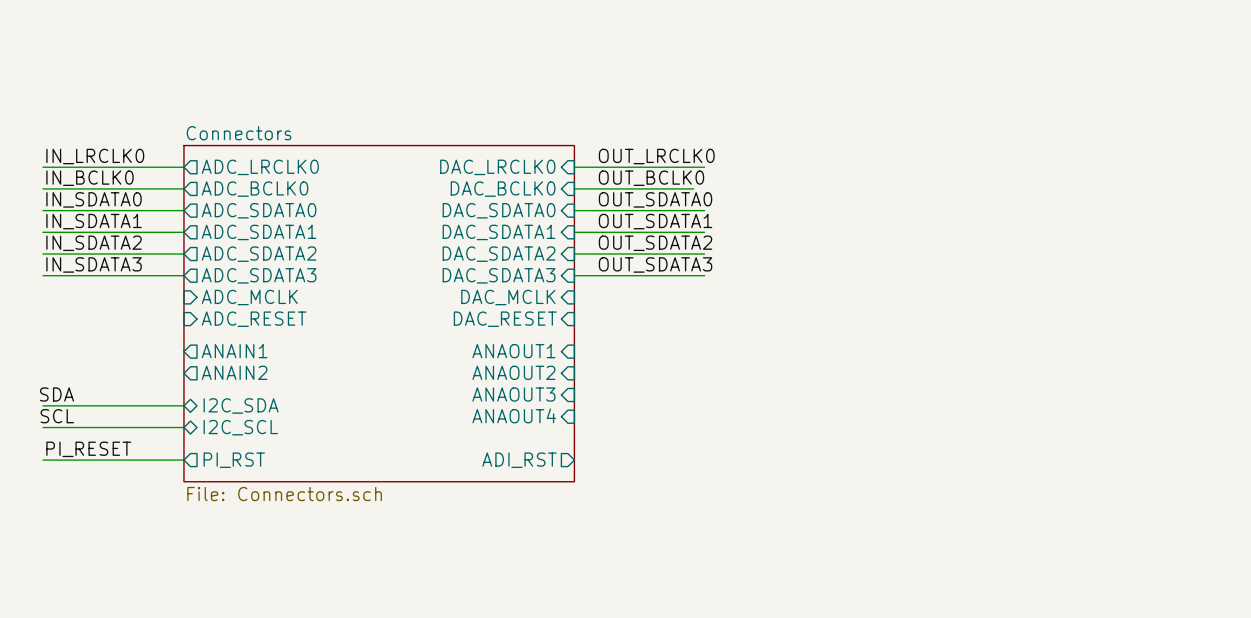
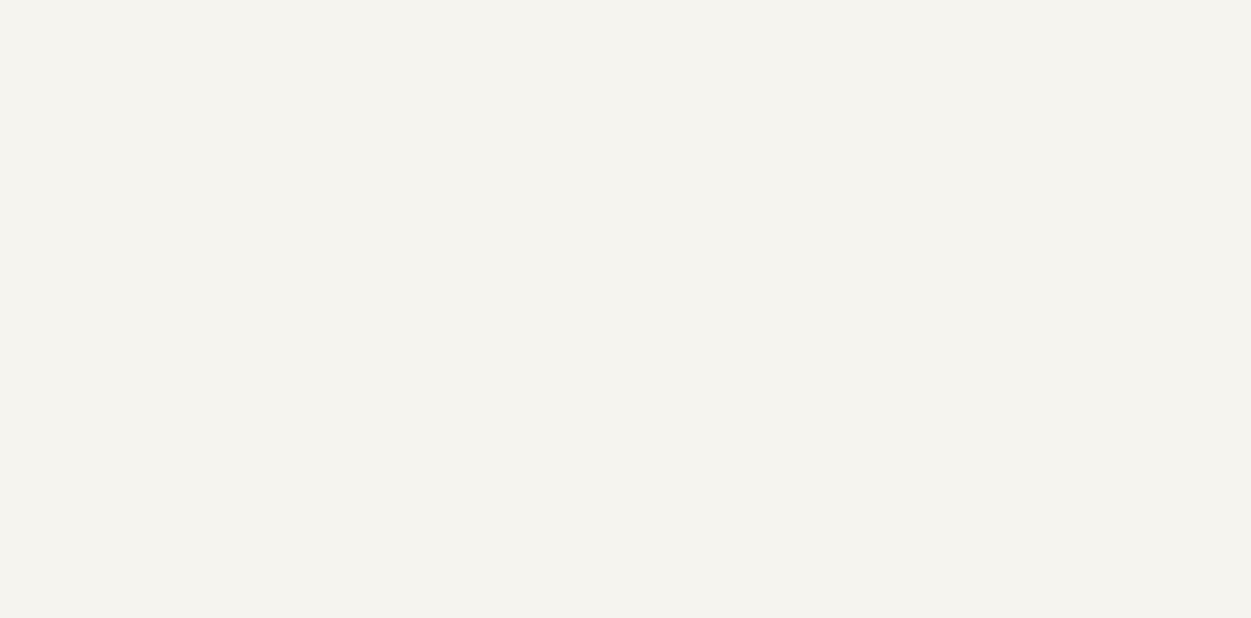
label: IN_LRCLK0 (95, 156) -> none
label: OUT_LRCLK0 (656, 156) -> none
wire: (42, 167) (183, 167) -> none
sheet pin: ADC_LRCLK0 (260, 167) -> none
sheet pin: DAC_LRCLK0 (497, 167) -> none
wire: (574, 167) (704, 167) -> none
label: IN_BCLK0 (90, 178) -> none
label: OUT_BCLK0 (651, 178) -> none
wire: (42, 188) (183, 188) -> none
wire: (574, 188) (693, 188) -> none
sheet pin: ADC_BCLK0 (255, 189) -> none
sheet pin: DAC_BCLK0 (503, 189) -> none
label: IN_SDATA0 (94, 199) -> none
label: OUT_SDATA0 (655, 199) -> none
wire: (42, 210) (183, 210) -> none
sheet pin: ADC_SDATA0 (259, 210) -> none
sheet pin: DAC_SDATA0 (499, 210) -> none
wire: (574, 210) (704, 210) -> none
label: IN_SDATA1 (94, 221) -> none
label: OUT_SDATA1 (655, 221) -> none
wire: (42, 232) (183, 232) -> none
sheet pin: ADC_SDATA1 (259, 232) -> none
sheet pin: DAC_SDATA1 (499, 232) -> none
wire: (574, 232) (704, 232) -> none
label: IN_SDATA2 (94, 243) -> none
label: OUT_SDATA2 (655, 243) -> none
wire: (42, 254) (183, 254) -> none
sheet pin: ADC_SDATA2 (259, 254) -> none
sheet pin: DAC_SDATA2 (499, 254) -> none
wire: (574, 254) (704, 254) -> none
label: IN_SDATA3 (94, 264) -> none
label: OUT_SDATA3 (655, 264) -> none
wire: (42, 275) (183, 275) -> none
sheet pin: ADC_SDATA3 (259, 275) -> none
sheet pin: DAC_SDATA3 (499, 275) -> none
wire: (574, 275) (704, 275) -> none
sheet pin: ADC_MCLK (249, 297) -> none
sheet pin: DAC_MCLK (508, 297) -> none
sheet Connectors: File: Connectors.sch (379, 313) -> none
sheet pin: ADC_RESET (254, 319) -> none
sheet pin: DAC_RESET (505, 319) -> none
sheet pin: ANAIN1 (234, 351) -> none
sheet pin: ANAOUT1 (513, 351) -> none
sheet pin: ANAIN2 (234, 372) -> none
sheet pin: ANAOUT2 (513, 372) -> none
label: SDA (57, 394) -> none
sheet pin: ANAOUT3 (513, 394) -> none
wire: (42, 405) (183, 405) -> none
sheet pin: I2C_SDA (241, 405) -> none
sheet pin: ANAOUT4 (514, 415) -> none
label: SCL (57, 416) -> none
wire: (42, 427) (183, 427) -> none
sheet pin: I2C_SCL (240, 427) -> none
label: PI_RESET (88, 449) -> none
wire: (42, 460) (183, 460) -> none
sheet pin: PI_RST (234, 460) -> none
sheet pin: ADI_RST (519, 460) -> none

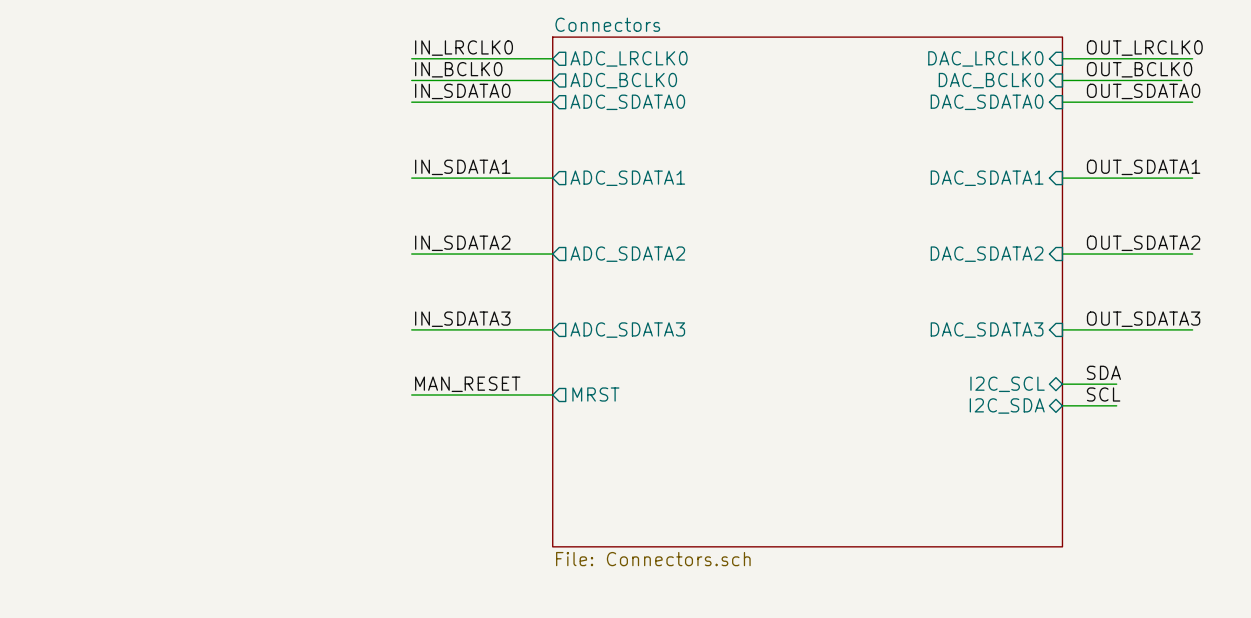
label: none -> IN_LRCLK0 (464, 48)
label: none -> OUT_LRCLK0 (1144, 48)
wire: none -> (411, 58) (552, 58)
sheet pin: none -> ADC_LRCLK0 (629, 58)
sheet pin: none -> DAC_LRCLK0 (985, 58)
wire: none -> (1062, 58) (1192, 58)
label: none -> IN_BCLK0 (458, 69)
label: none -> OUT_BCLK0 (1139, 69)
wire: none -> (411, 80) (552, 80)
sheet pin: none -> ADC_BCLK0 (623, 80)
sheet pin: none -> DAC_BCLK0 (991, 80)
wire: none -> (1062, 80) (1181, 80)
label: none -> IN_SDATA0 (462, 91)
label: none -> OUT_SDATA0 (1143, 91)
wire: none -> (411, 102) (552, 102)
sheet pin: none -> ADC_SDATA0 (627, 102)
sheet pin: none -> DAC_SDATA0 (987, 102)
wire: none -> (1062, 102) (1192, 102)
label: none -> IN_SDATA1 (462, 167)
label: none -> OUT_SDATA1 (1143, 167)
wire: none -> (411, 178) (552, 178)
sheet pin: none -> ADC_SDATA1 (627, 178)
sheet pin: none -> DAC_SDATA1 (987, 178)
wire: none -> (1062, 178) (1192, 178)
label: none -> IN_SDATA2 (462, 243)
label: none -> OUT_SDATA2 (1143, 243)
wire: none -> (411, 254) (552, 254)
sheet pin: none -> ADC_SDATA2 (627, 254)
sheet pin: none -> DAC_SDATA2 (987, 254)
wire: none -> (1062, 254) (1192, 254)
sheet Connectors: none -> File: Connectors.sch (807, 291)
label: none -> IN_SDATA3 (462, 319)
label: none -> OUT_SDATA3 (1143, 319)
wire: none -> (411, 329) (552, 329)
wire: none -> (1062, 329) (1192, 329)
sheet pin: none -> ADC_SDATA3 (627, 330)
sheet pin: none -> DAC_SDATA3 (987, 330)
label: none -> SDA (1103, 372)
label: none -> MAN_RESET (467, 384)
sheet pin: none -> I2C_SCL (1007, 384)
wire: none -> (1062, 384) (1116, 384)
sheet pin: none -> MRST (595, 394)
label: none -> SCL (1103, 394)
wire: none -> (411, 395) (552, 395)
sheet pin: none -> I2C_SDA (1007, 405)
wire: none -> (1062, 405) (1116, 405)

